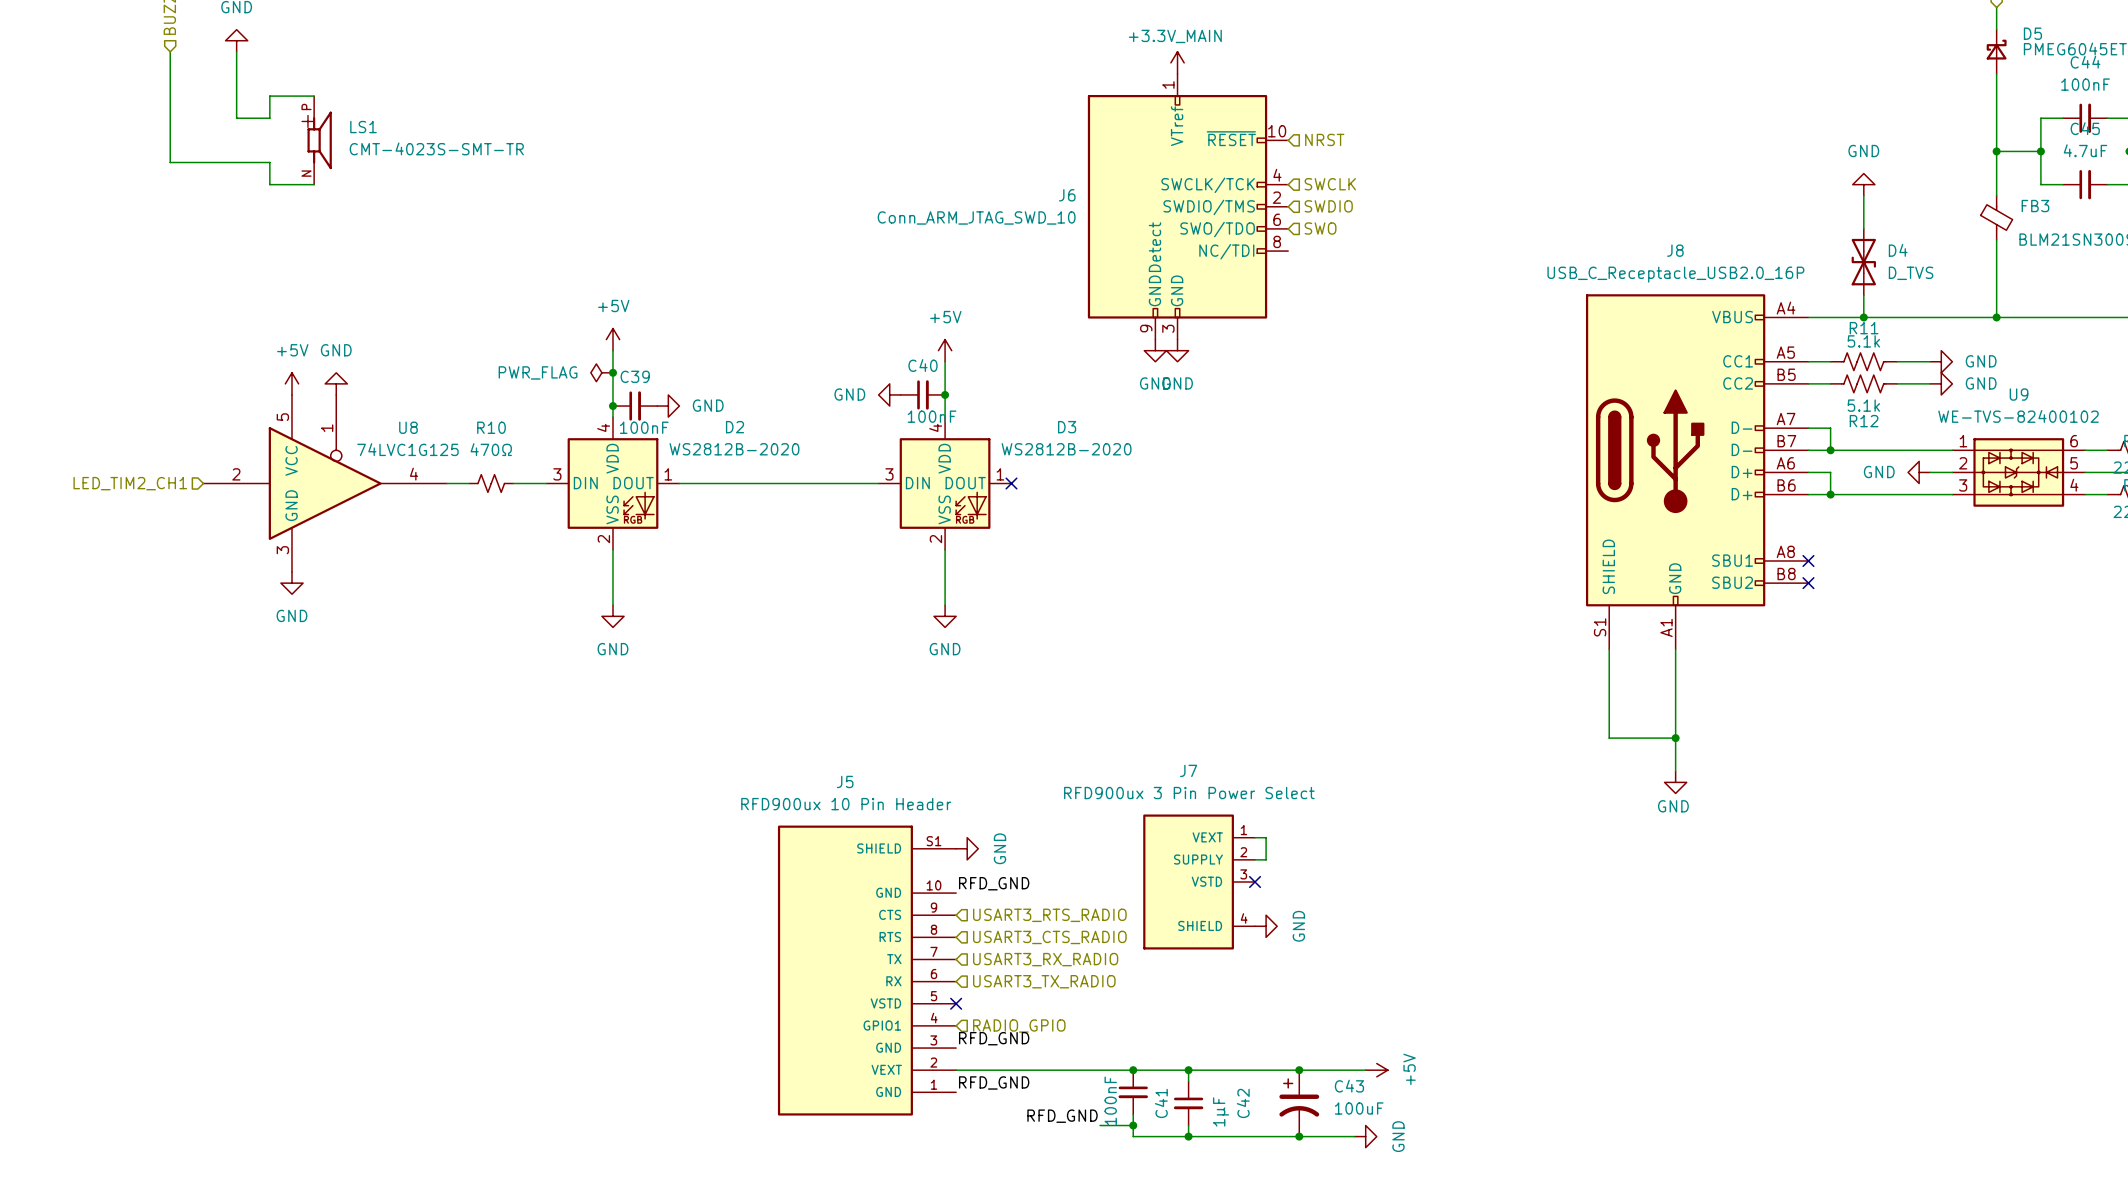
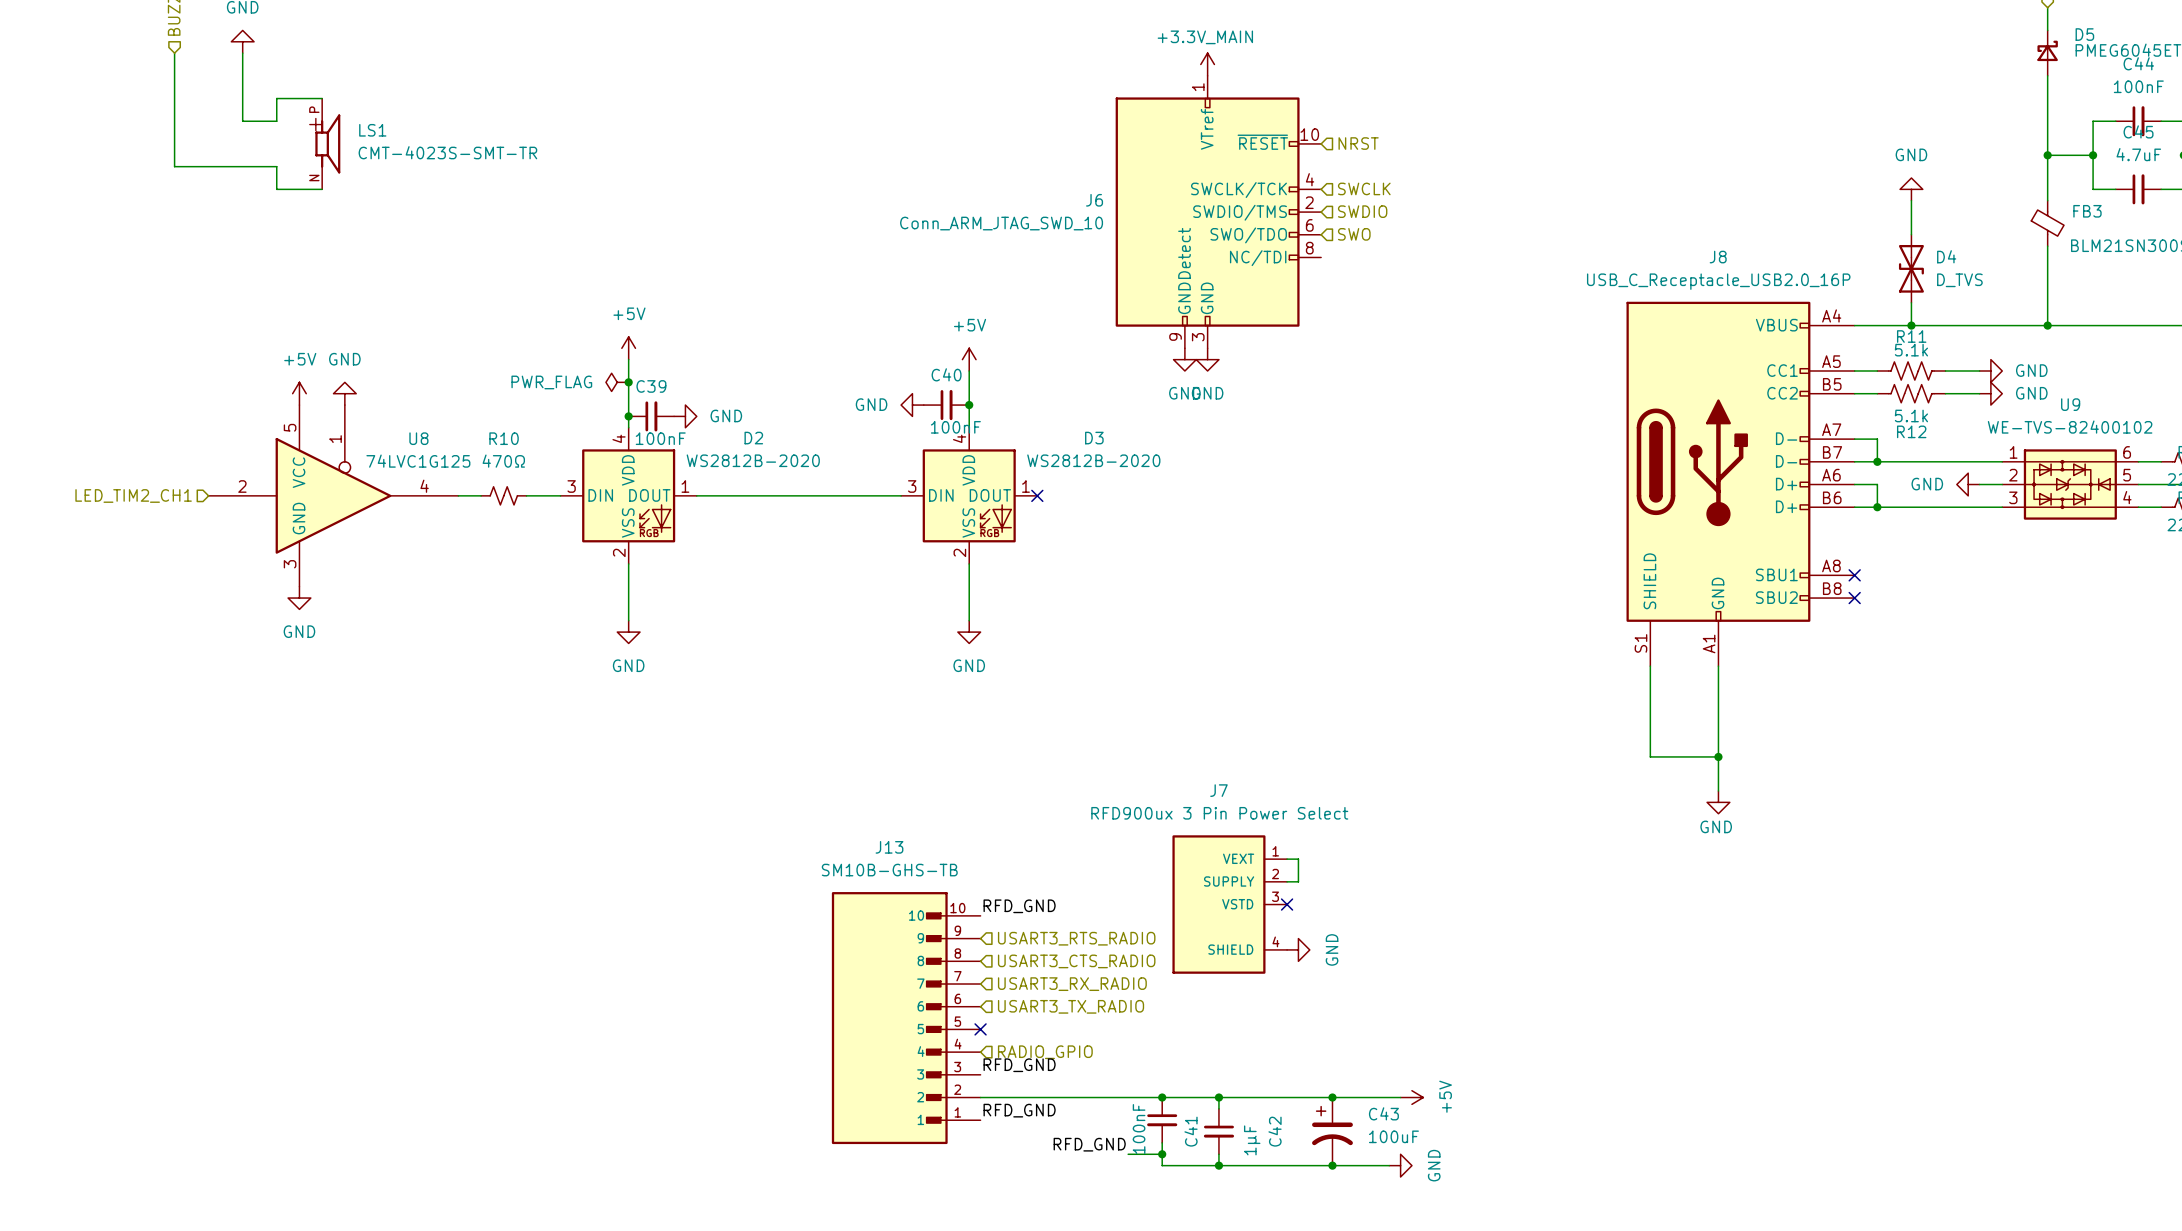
power symbol: GND (967, 848) -> none
J5: RFD900ux 10 Pin Header (867, 970) -> none
J13: none -> SM10B-GHS-TB (906, 1018)

